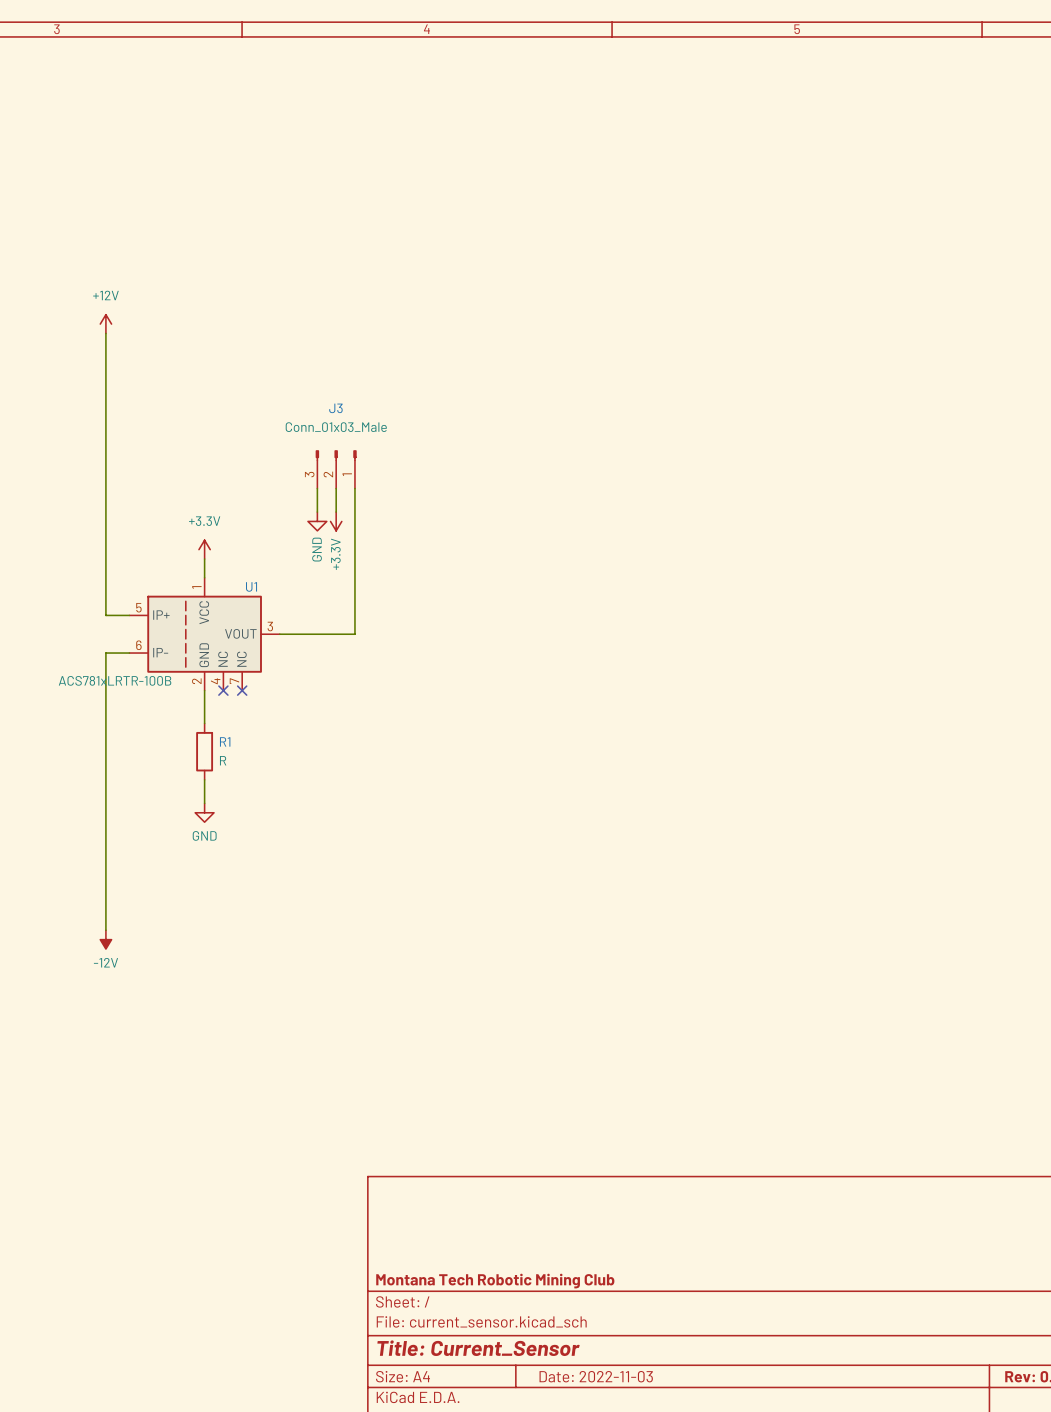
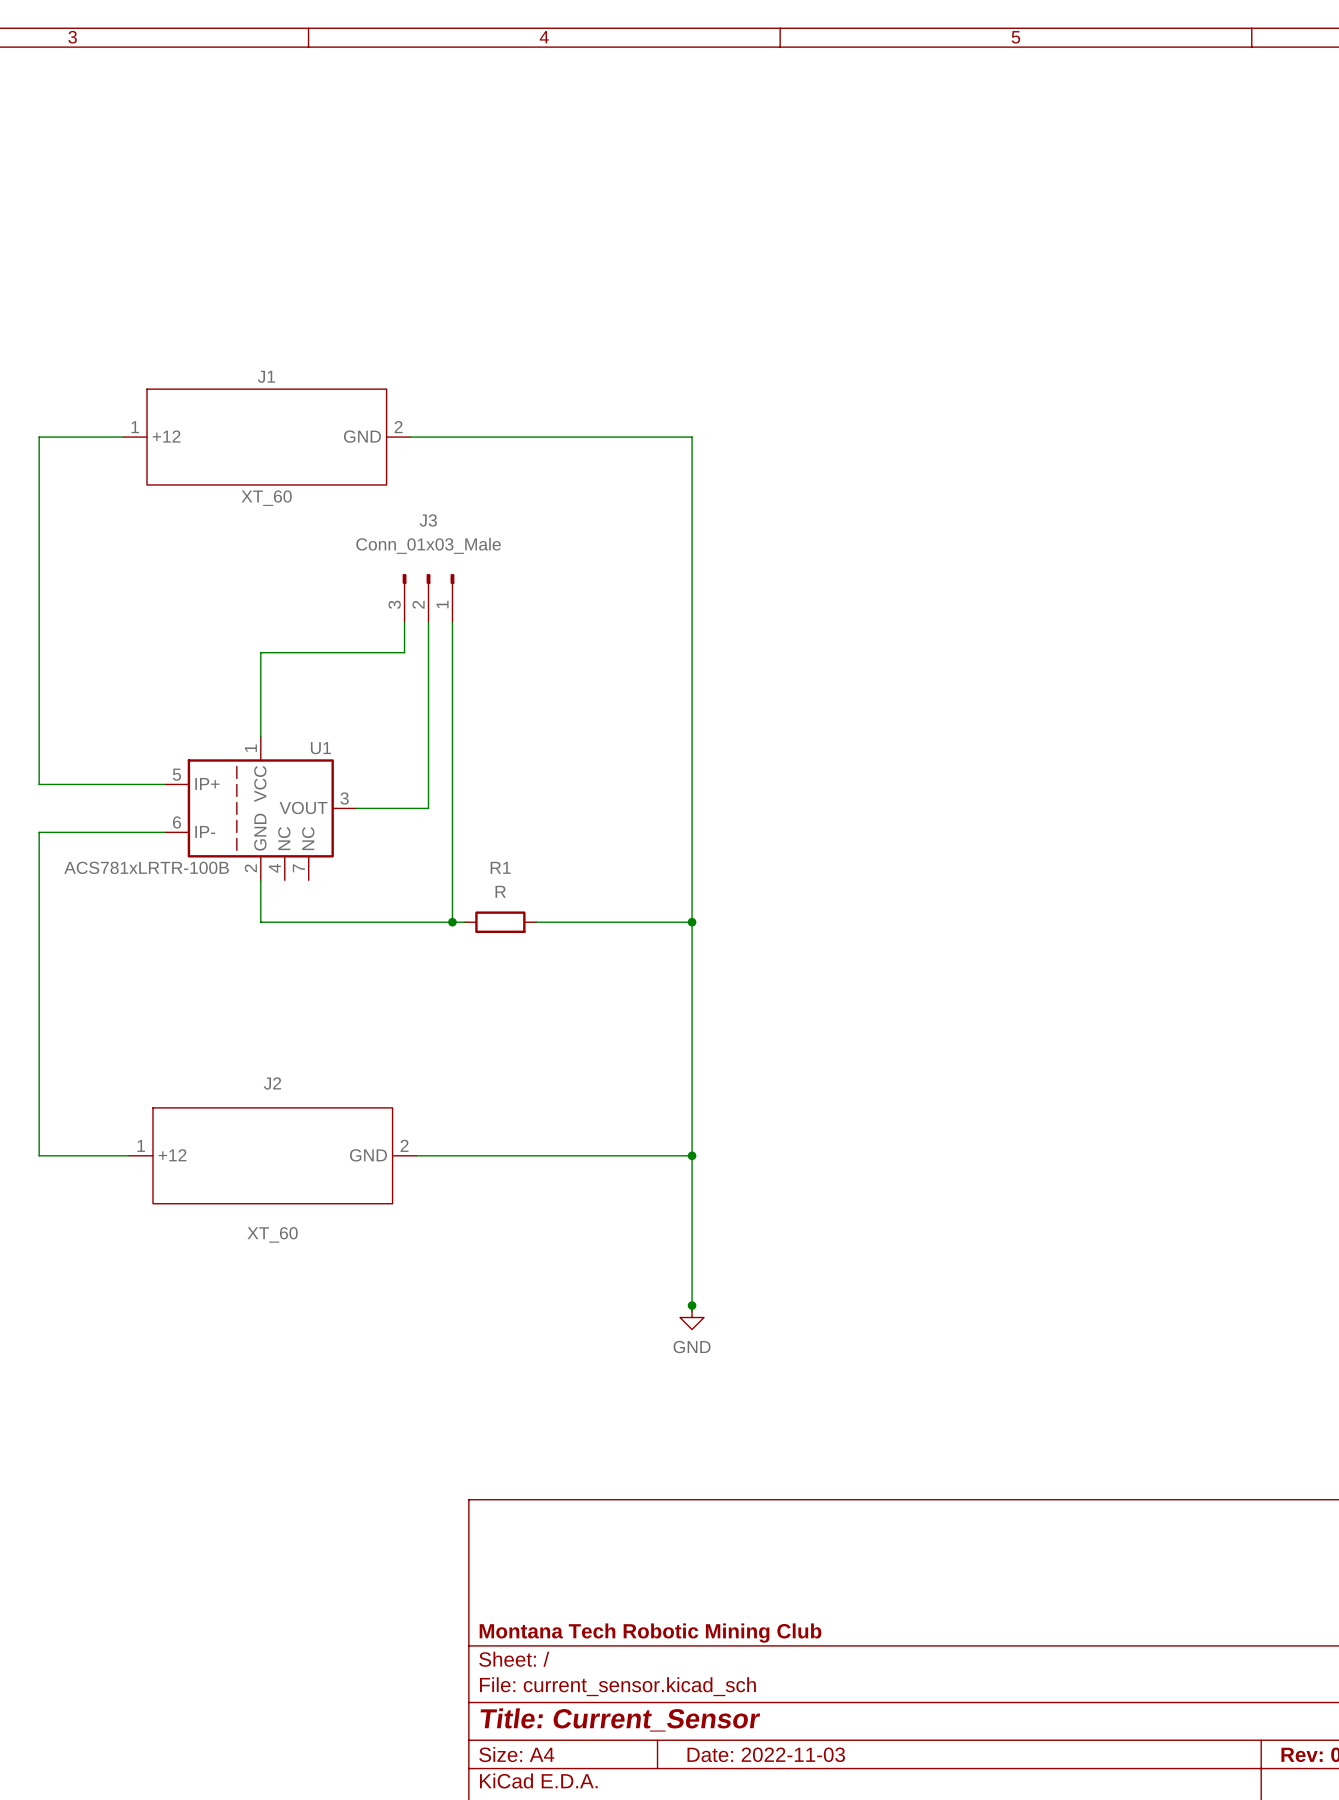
J1: none -> XT_60 (242, 257)
power symbol: +12V (105, 324) -> none
wire: (105, 333) (105, 615) -> (123, 437) (39, 437) (39, 784) (135, 784)
wire: none -> (410, 437) (692, 437) (692, 1311)
wire: none -> (404, 652) (260, 652) (260, 712)
wire: none -> (428, 652) (428, 808)
power symbol: GND (317, 521) -> none
power symbol: +3.3V (336, 521) -> none
power symbol: +3.3V (204, 549) -> none
wire: (336, 634) (354, 634) -> (452, 922) (452, 808)
wire: (105, 653) (105, 930) -> (135, 832) (39, 832) (39, 1155) (129, 1155)
no-connect mark: (223, 690) -> none
no-connect mark: (242, 690) -> none
wire: none -> (260, 922) (464, 922)
junction: none -> (452, 922)
wire: none -> (536, 922) (692, 922)
junction: none -> (692, 922)
R1 name position: R1 (225, 741) -> R1 (500, 867)
R1 rotation: 0° (204, 751) -> 90° clockwise (500, 922)
R1 position: (204, 751) -> (500, 922)
R1 value position: R (223, 760) -> R (500, 891)
J2: none -> XT_60 (248, 976)
wire: (204, 779) (204, 803) -> none
power symbol: GND (204, 812) -> none
wire: none -> (416, 1155) (692, 1155)
junction: none -> (692, 1155)
power symbol: -12V (105, 939) -> none
junction: none -> (692, 1305)
power symbol: none -> GND (692, 1317)

